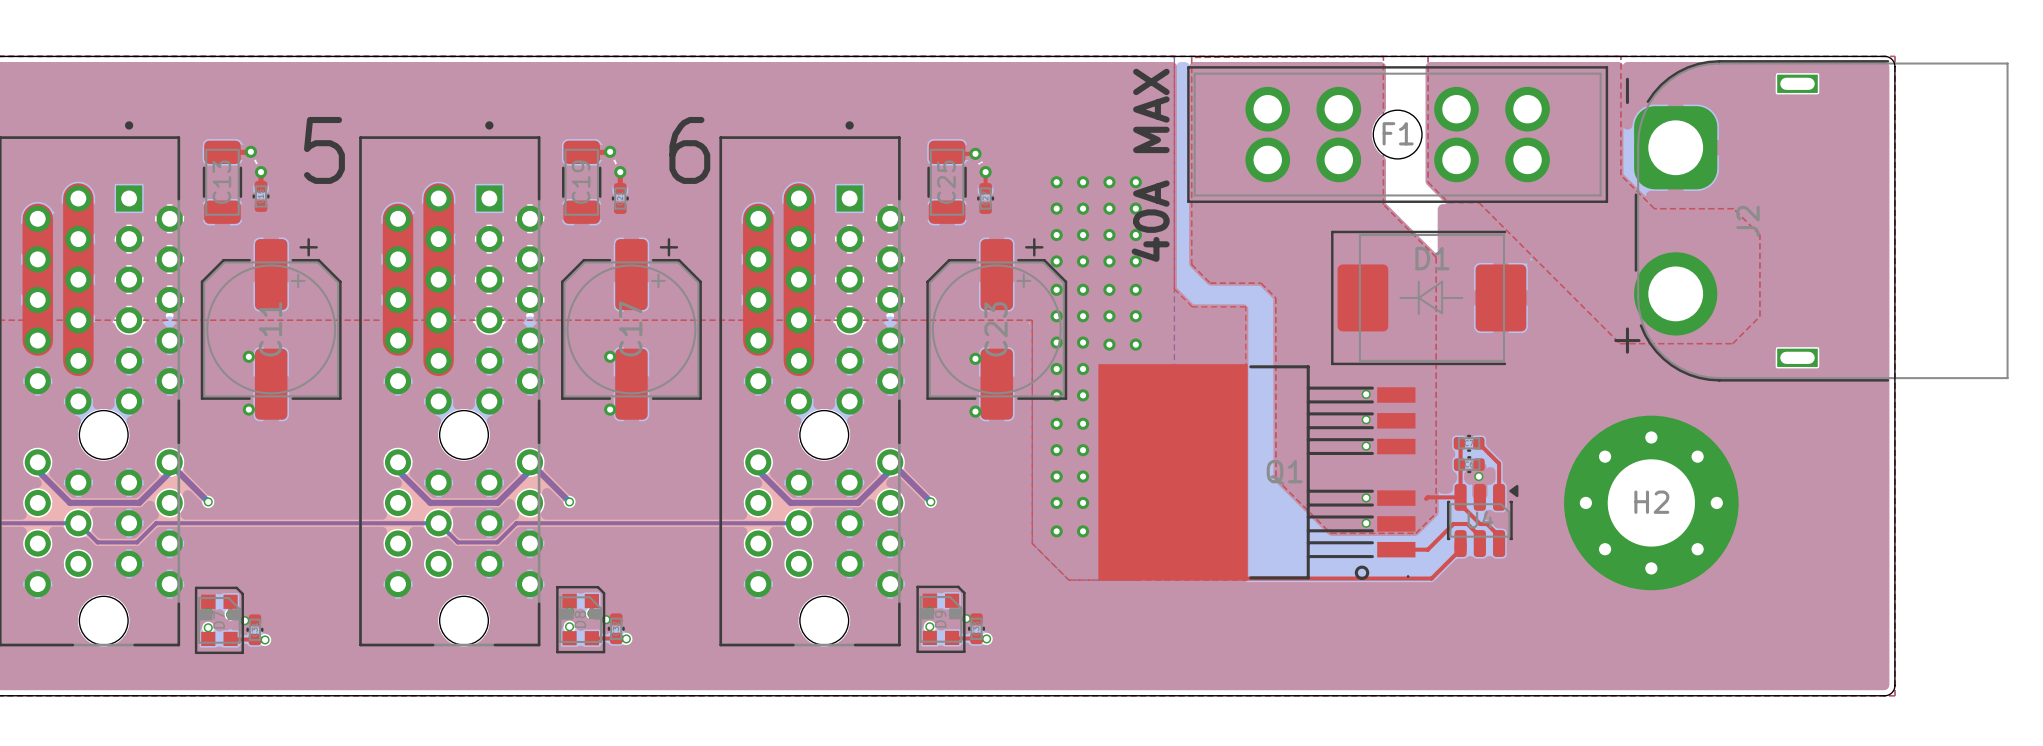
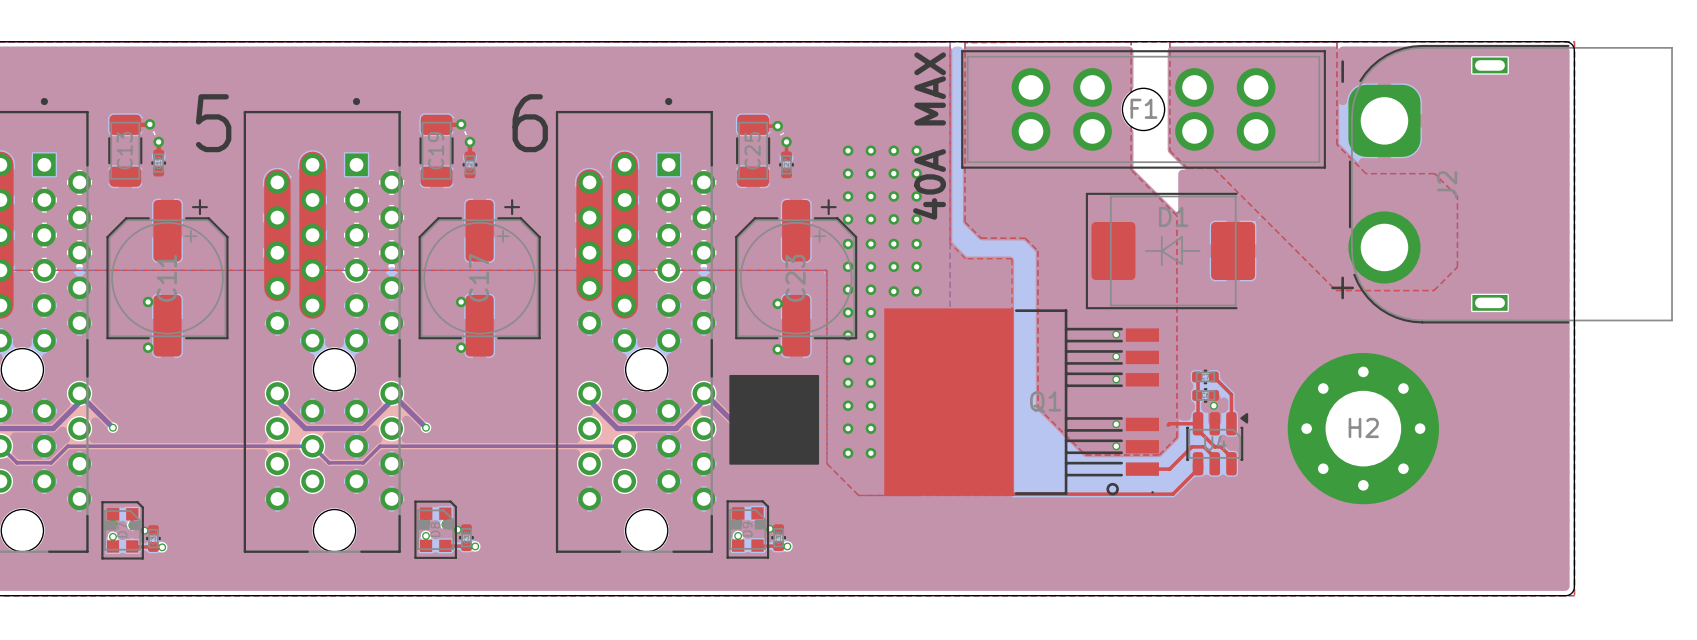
drawing: none -> [729, 374, 820, 465]

